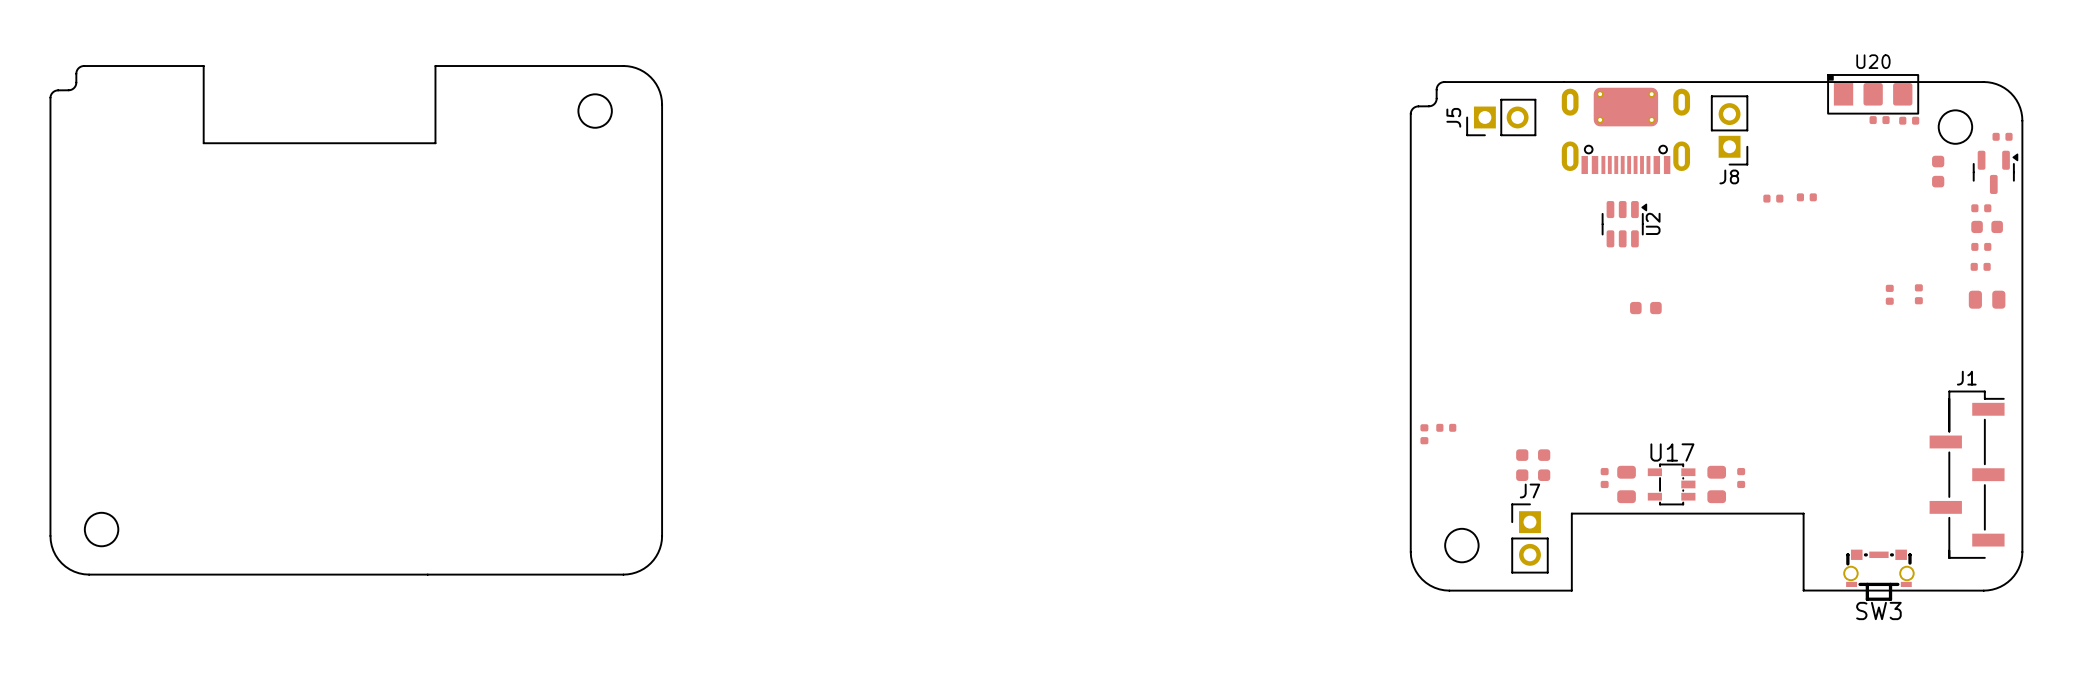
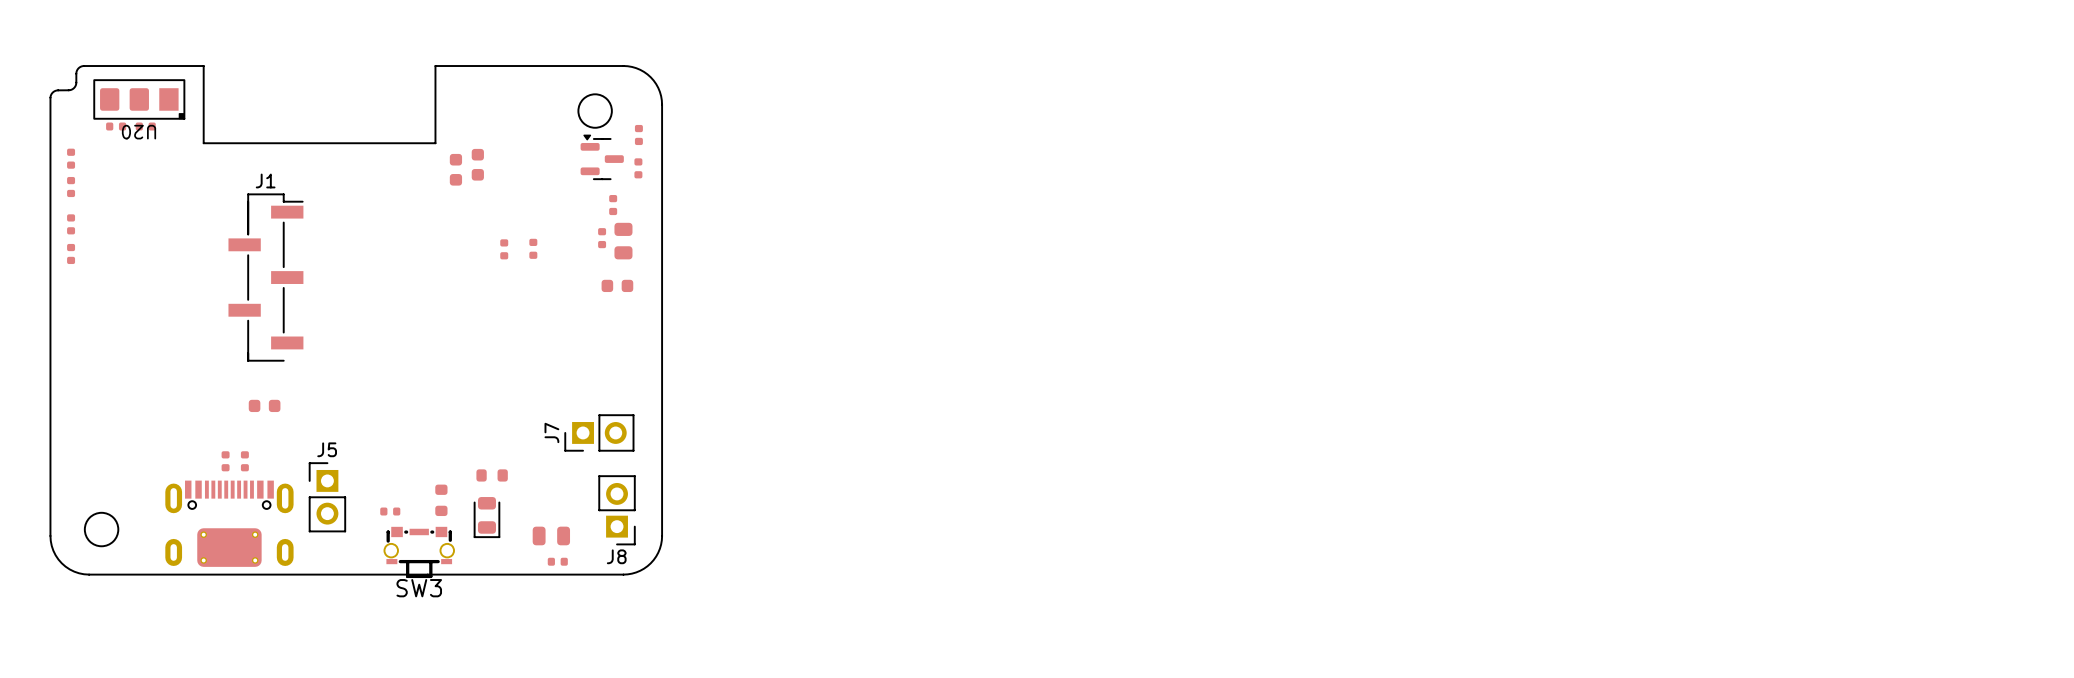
board edge: (1444, 82) (1983, 82) -> none
board edge: (1983, 82) (2000, 85) (2011, 93) (2018, 103) (2022, 120) (2022, 556) (2018, 568) (2007, 582) (1996, 588) (1983, 590) (1803, 590) (1803, 513) (1571, 513) (1571, 590) (1444, 590) (1434, 587) (1422, 579) (1413, 566) (1410, 552) (1410, 113) (1415, 106) (1434, 104) (1437, 86) (1444, 82) -> none
U20 rotation: 0° (1873, 94) -> 180° (139, 99)
U20 position: (1873, 94) -> (139, 99)
round board edge: [1938, 110, 1973, 145] -> none
J5 rotation: 0° (1501, 117) -> 90° clockwise (327, 497)
J5 position: (1501, 117) -> (327, 497)
part: (1879, 120) -> none
part: (1909, 120) -> none
part: none -> (116, 126)
part: none -> (145, 126)
part: (1625, 130) -> none
J8 position: (1729, 130) -> (617, 510)
part: none -> (638, 135)
part: (2002, 136) -> none
part: none -> (602, 157)
part: none -> (71, 158)
part: none -> (477, 164)
part: none -> (638, 168)
part: none -> (455, 169)
part: (1938, 171) -> none
part: (1995, 172) -> none
part: none -> (71, 187)
part: (1806, 197) -> none
part: (1773, 198) -> none
part: none -> (613, 205)
part: (1981, 208) -> none
part: none -> (71, 224)
U2: (1624, 224) -> none
part: (1987, 226) -> none
part: none -> (602, 238)
part: none -> (623, 241)
part: (1981, 246) -> none
part: none -> (533, 248)
part: none -> (504, 249)
part: none -> (71, 253)
part: (1980, 266) -> none
part: none -> (617, 285)
part: (1889, 294) -> none
part: (1918, 294) -> none
part: (1987, 299) -> none
part: (1645, 308) -> none
part: none -> (264, 405)
part: (1446, 427) -> none
part: (1424, 434) -> none
part: none -> (225, 461)
part: none -> (244, 461)
part: (1522, 465) -> none
part: (1544, 465) -> none
J1 position: (1967, 474) -> (265, 277)
part: none -> (492, 475)
part: (1604, 478) -> none
part: (1741, 478) -> none
part: (1626, 484) -> none
U17: (1671, 484) -> none
part: (1716, 484) -> none
part: none -> (441, 500)
part: none -> (390, 511)
part: none -> (486, 517)
part: none -> (229, 523)
round board edge: [1444, 528, 1479, 563] -> none
part: none -> (551, 535)
J7 rotation: 0° (1529, 538) -> 90° counterclockwise (599, 432)
J7 position: (1529, 538) -> (599, 432)
part: none -> (557, 561)
SW3 position: (1878, 575) -> (419, 552)

